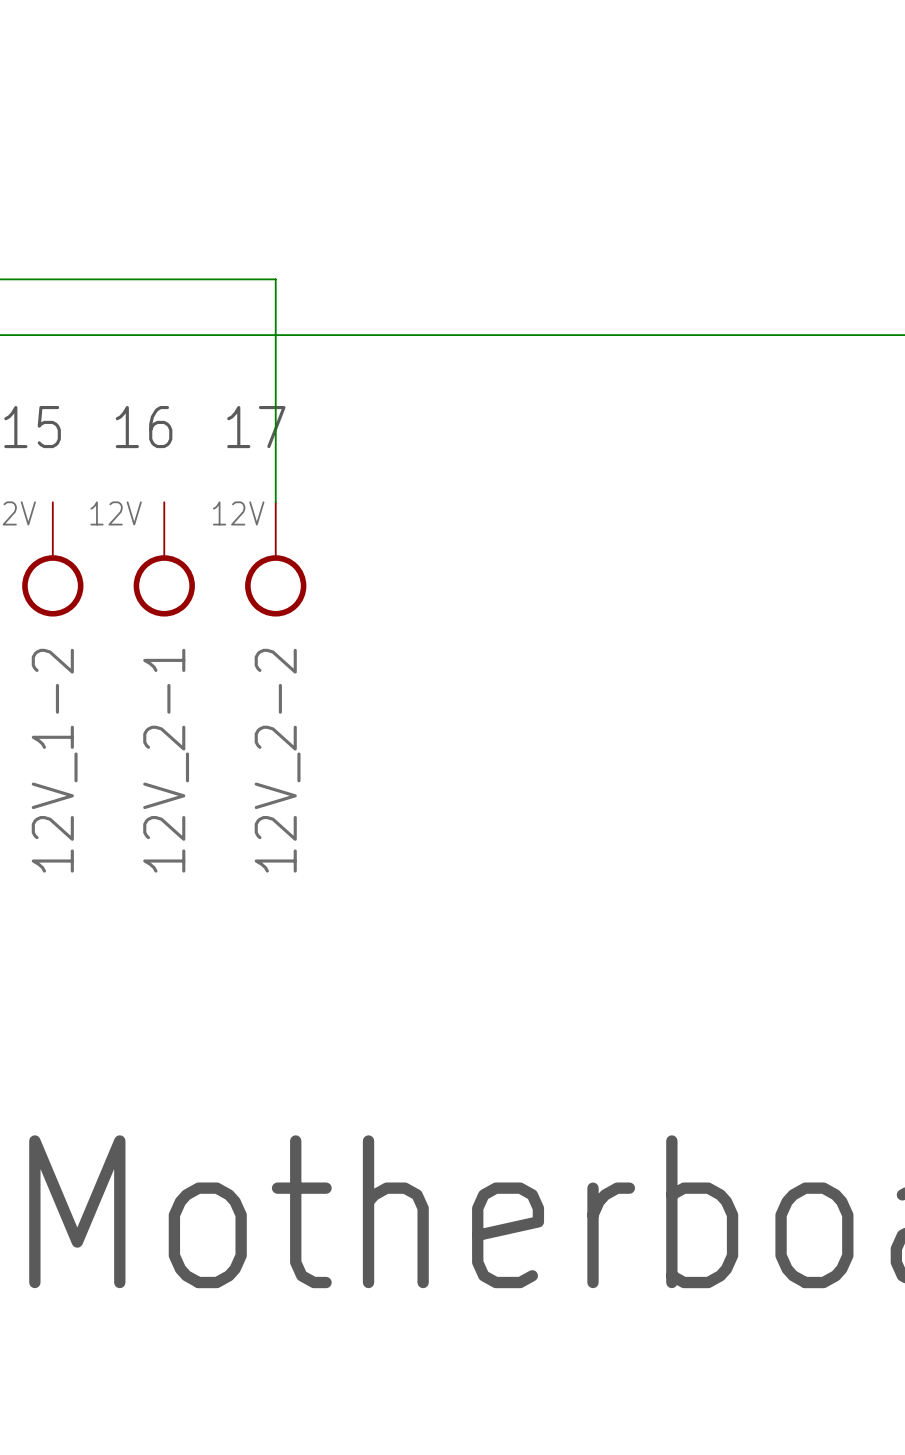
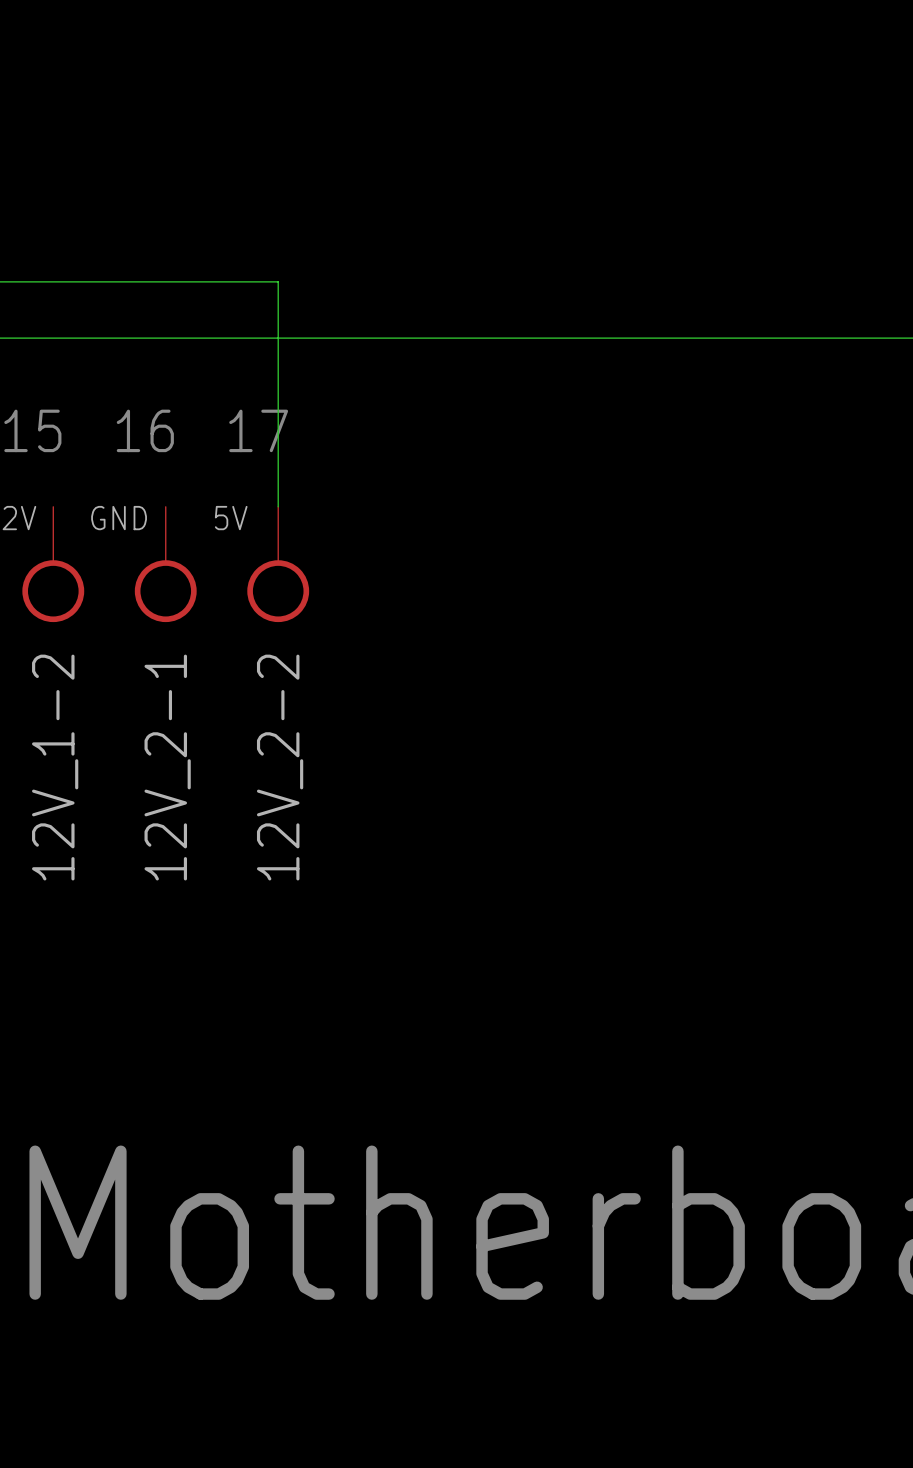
text: 12V (116, 513) -> GND (119, 518)
text: 12V (238, 513) -> 5V (231, 518)

